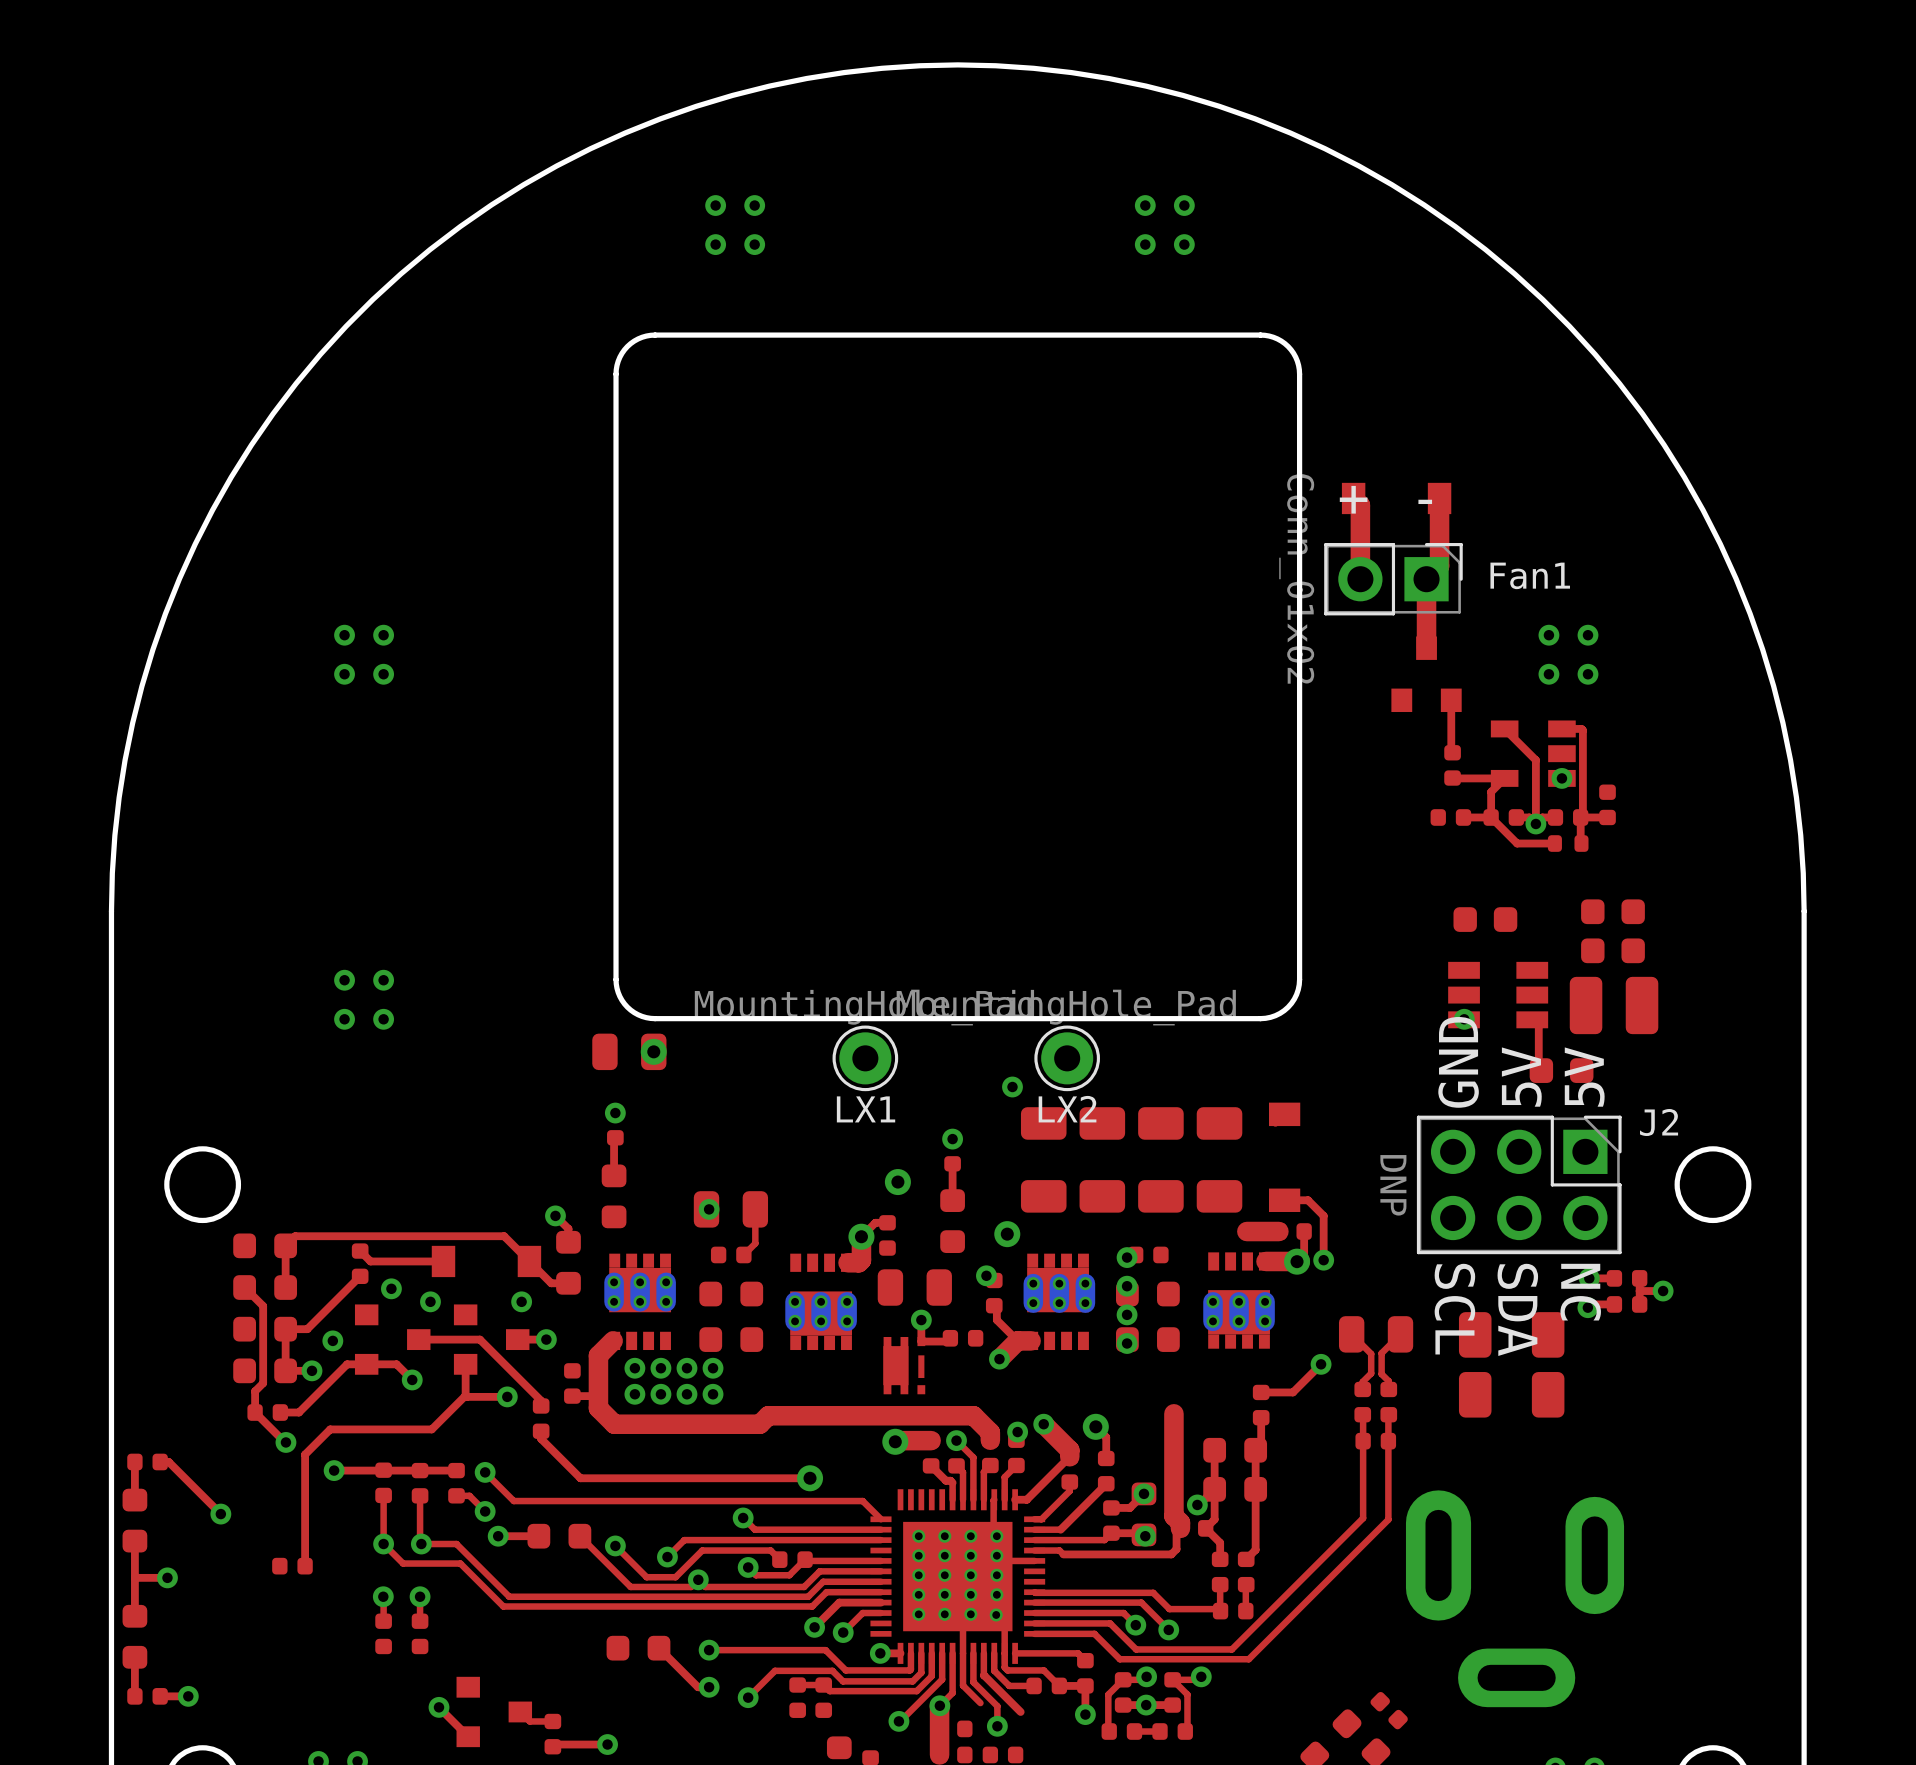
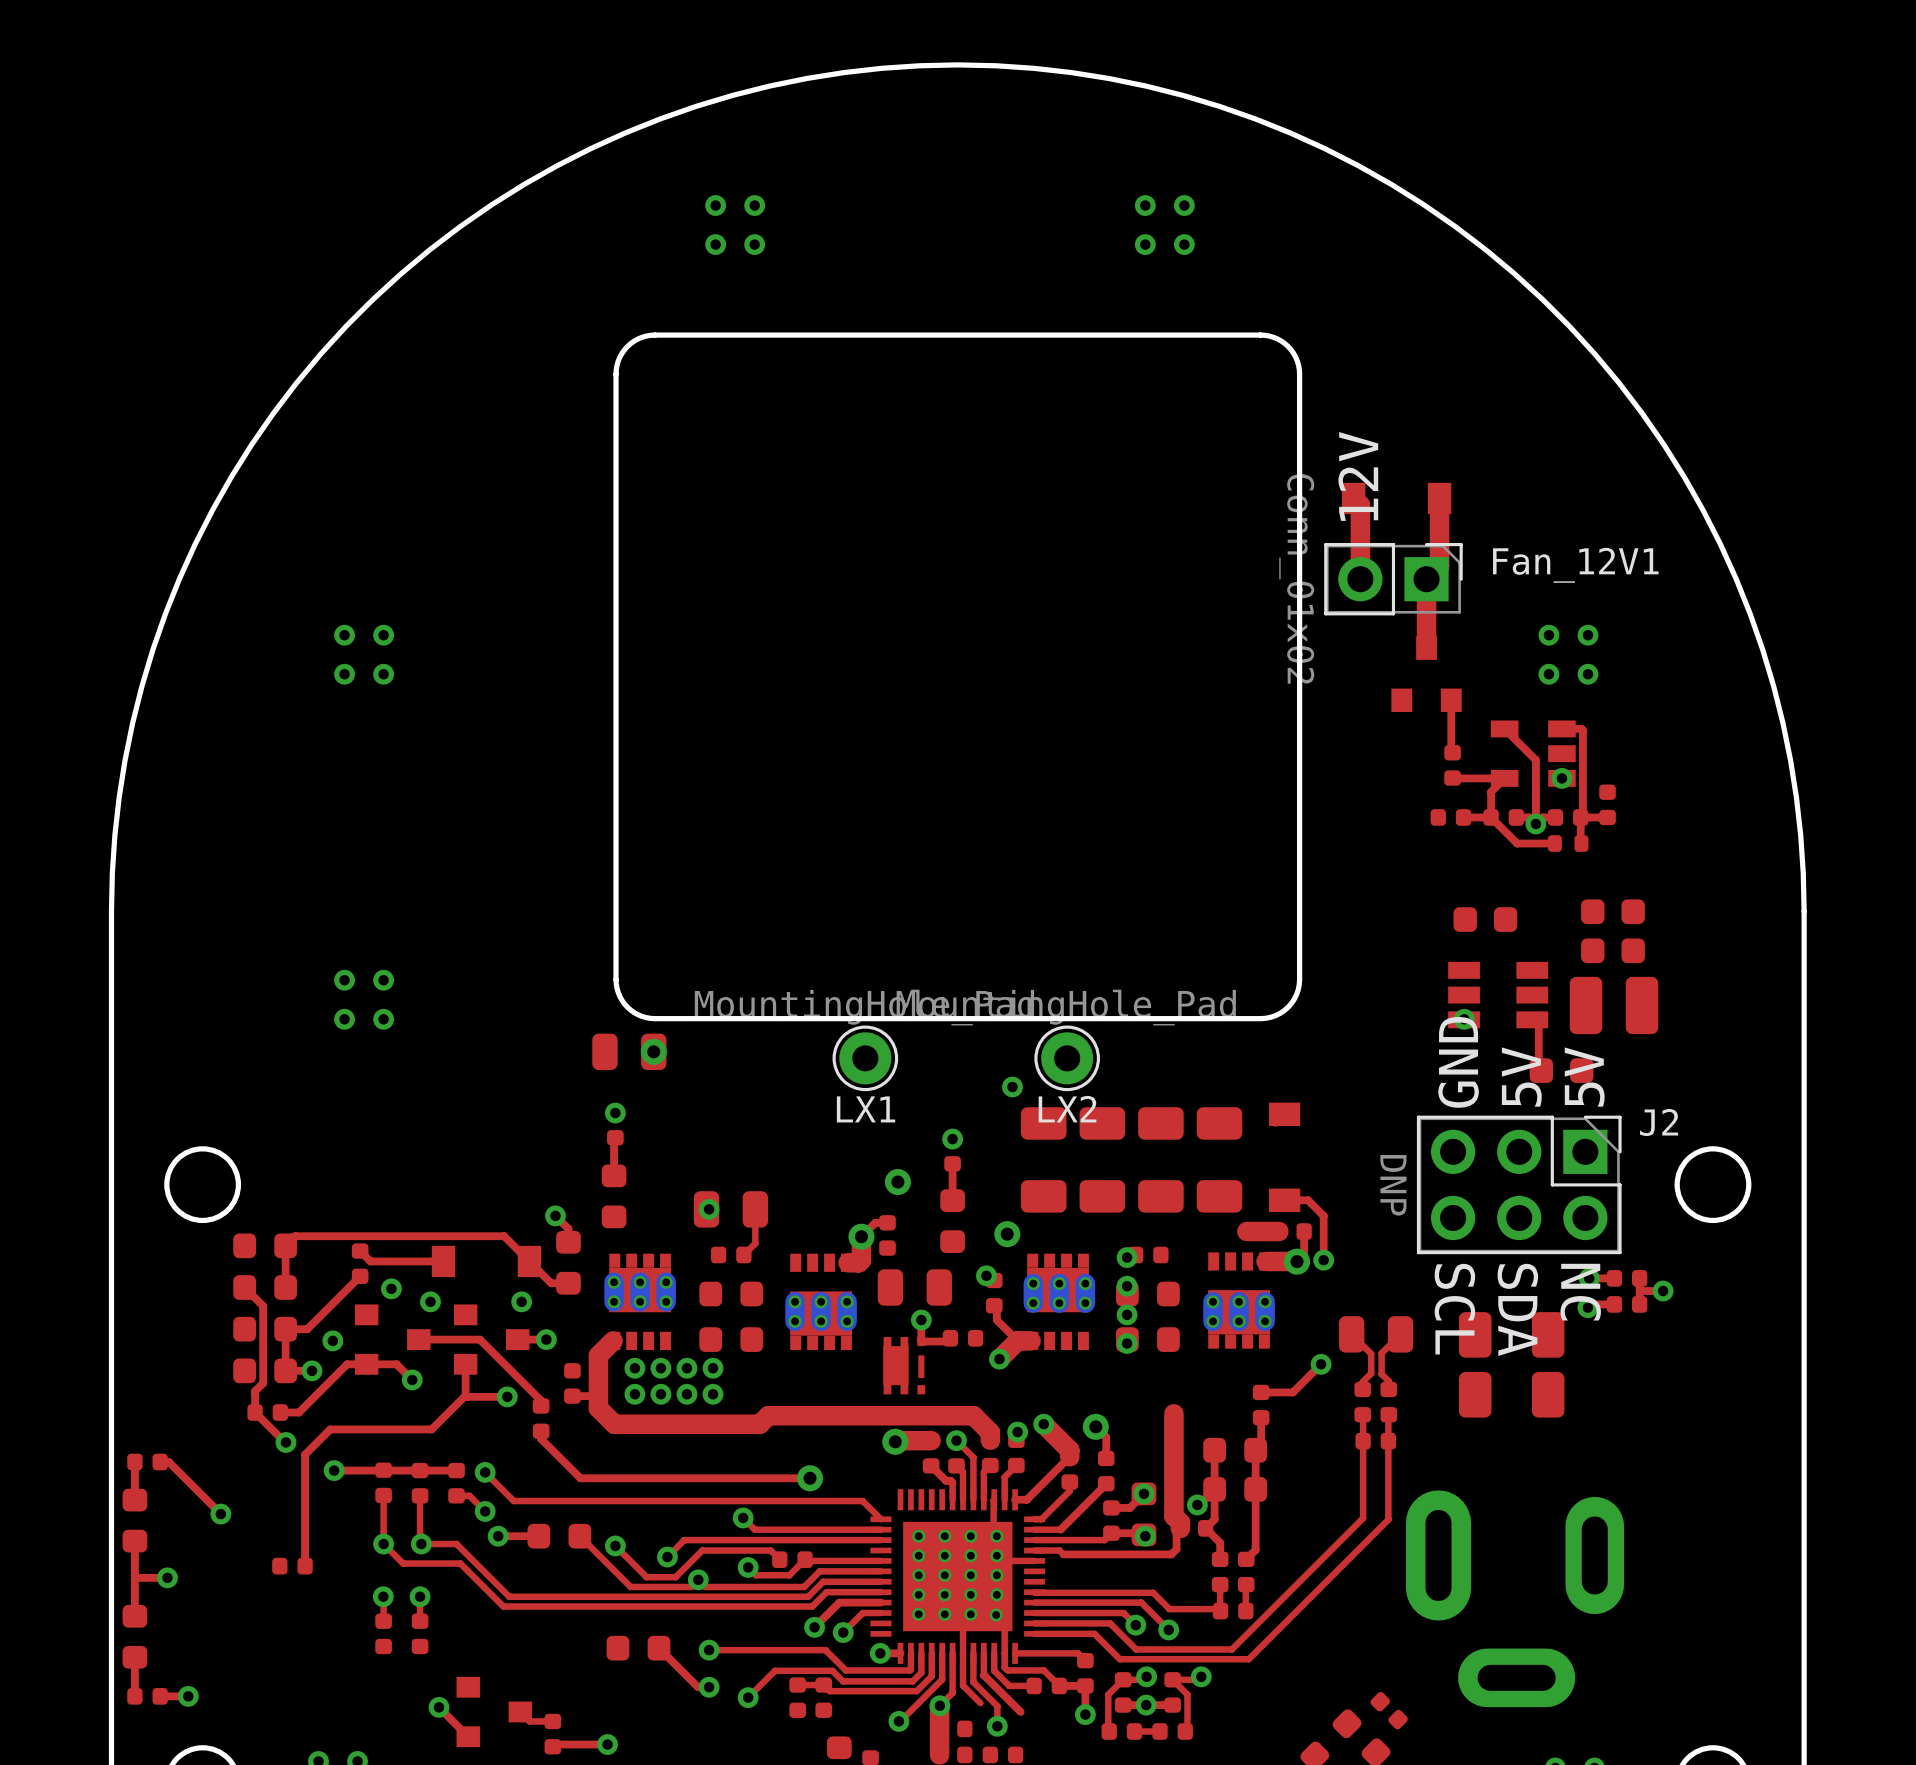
text: + (1353, 499) -> 12V (1358, 476)
text: - (1425, 501) -> none
Fan1 name: Fan1 (1530, 575) -> Fan_12V1 (1575, 565)

